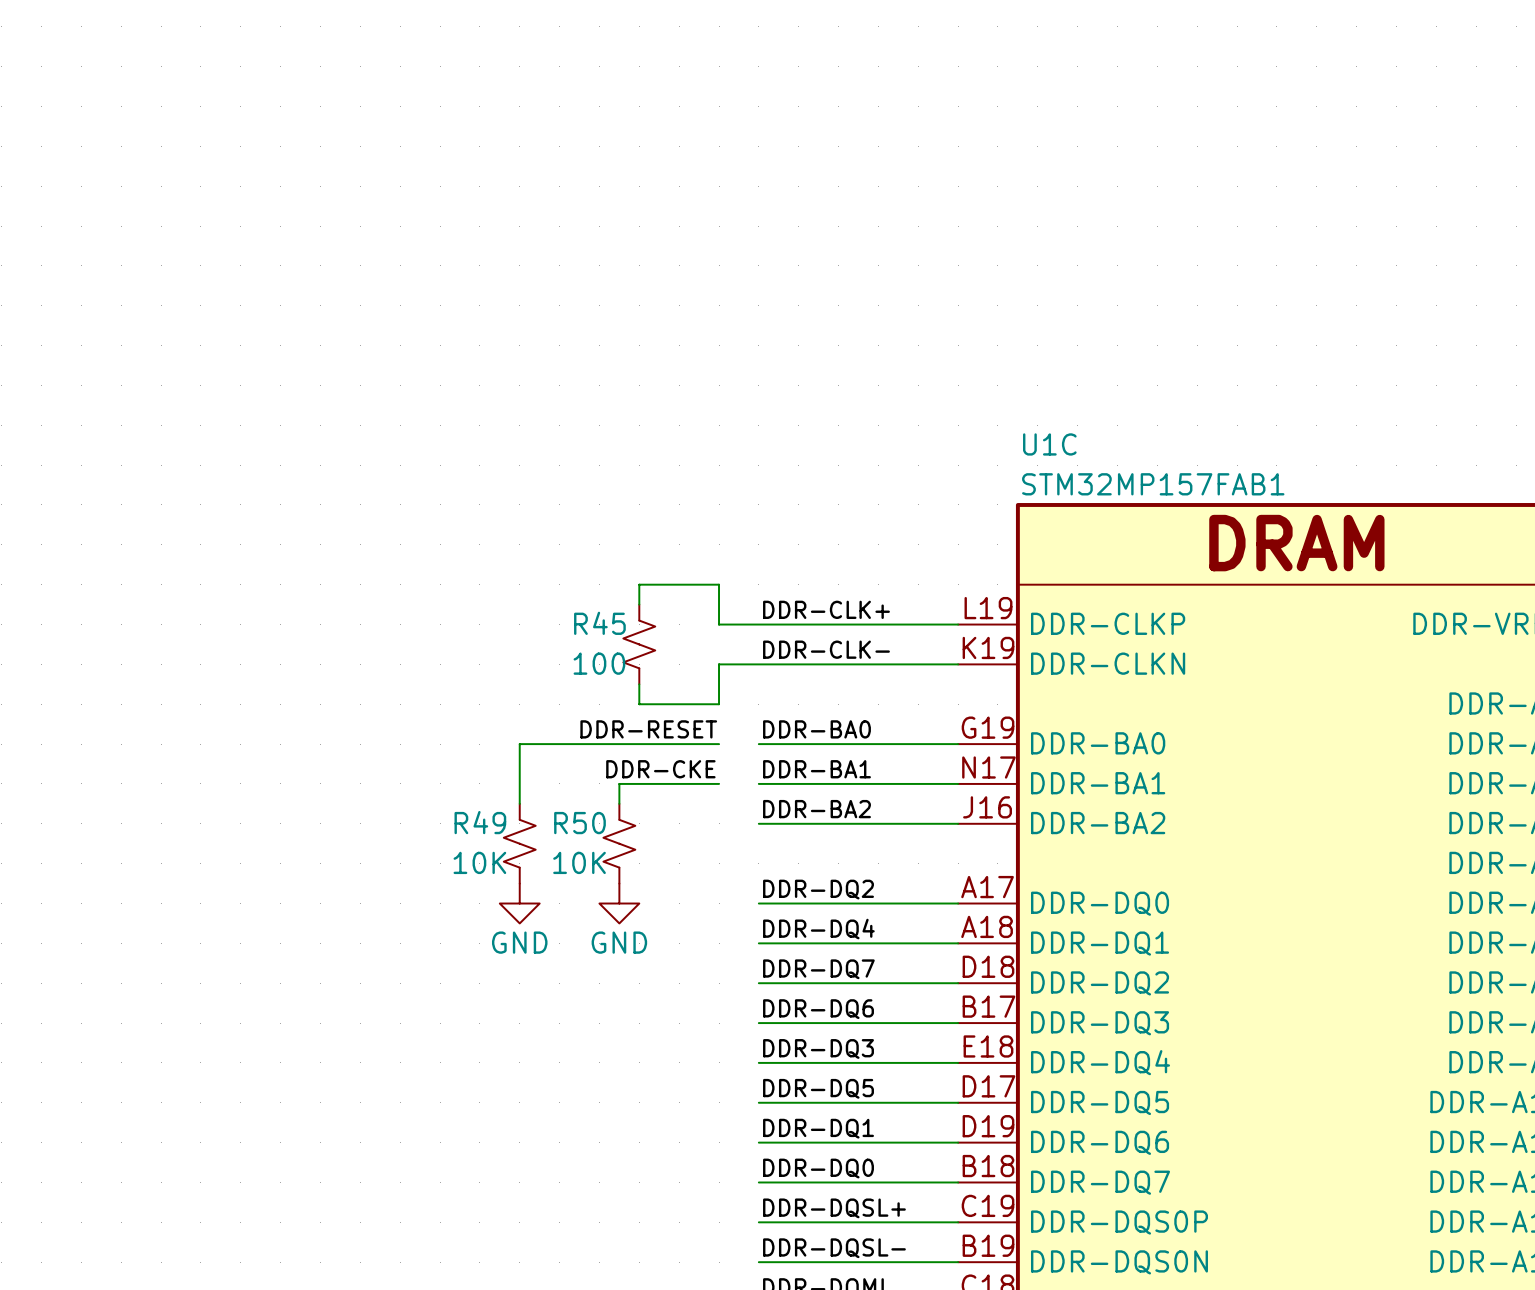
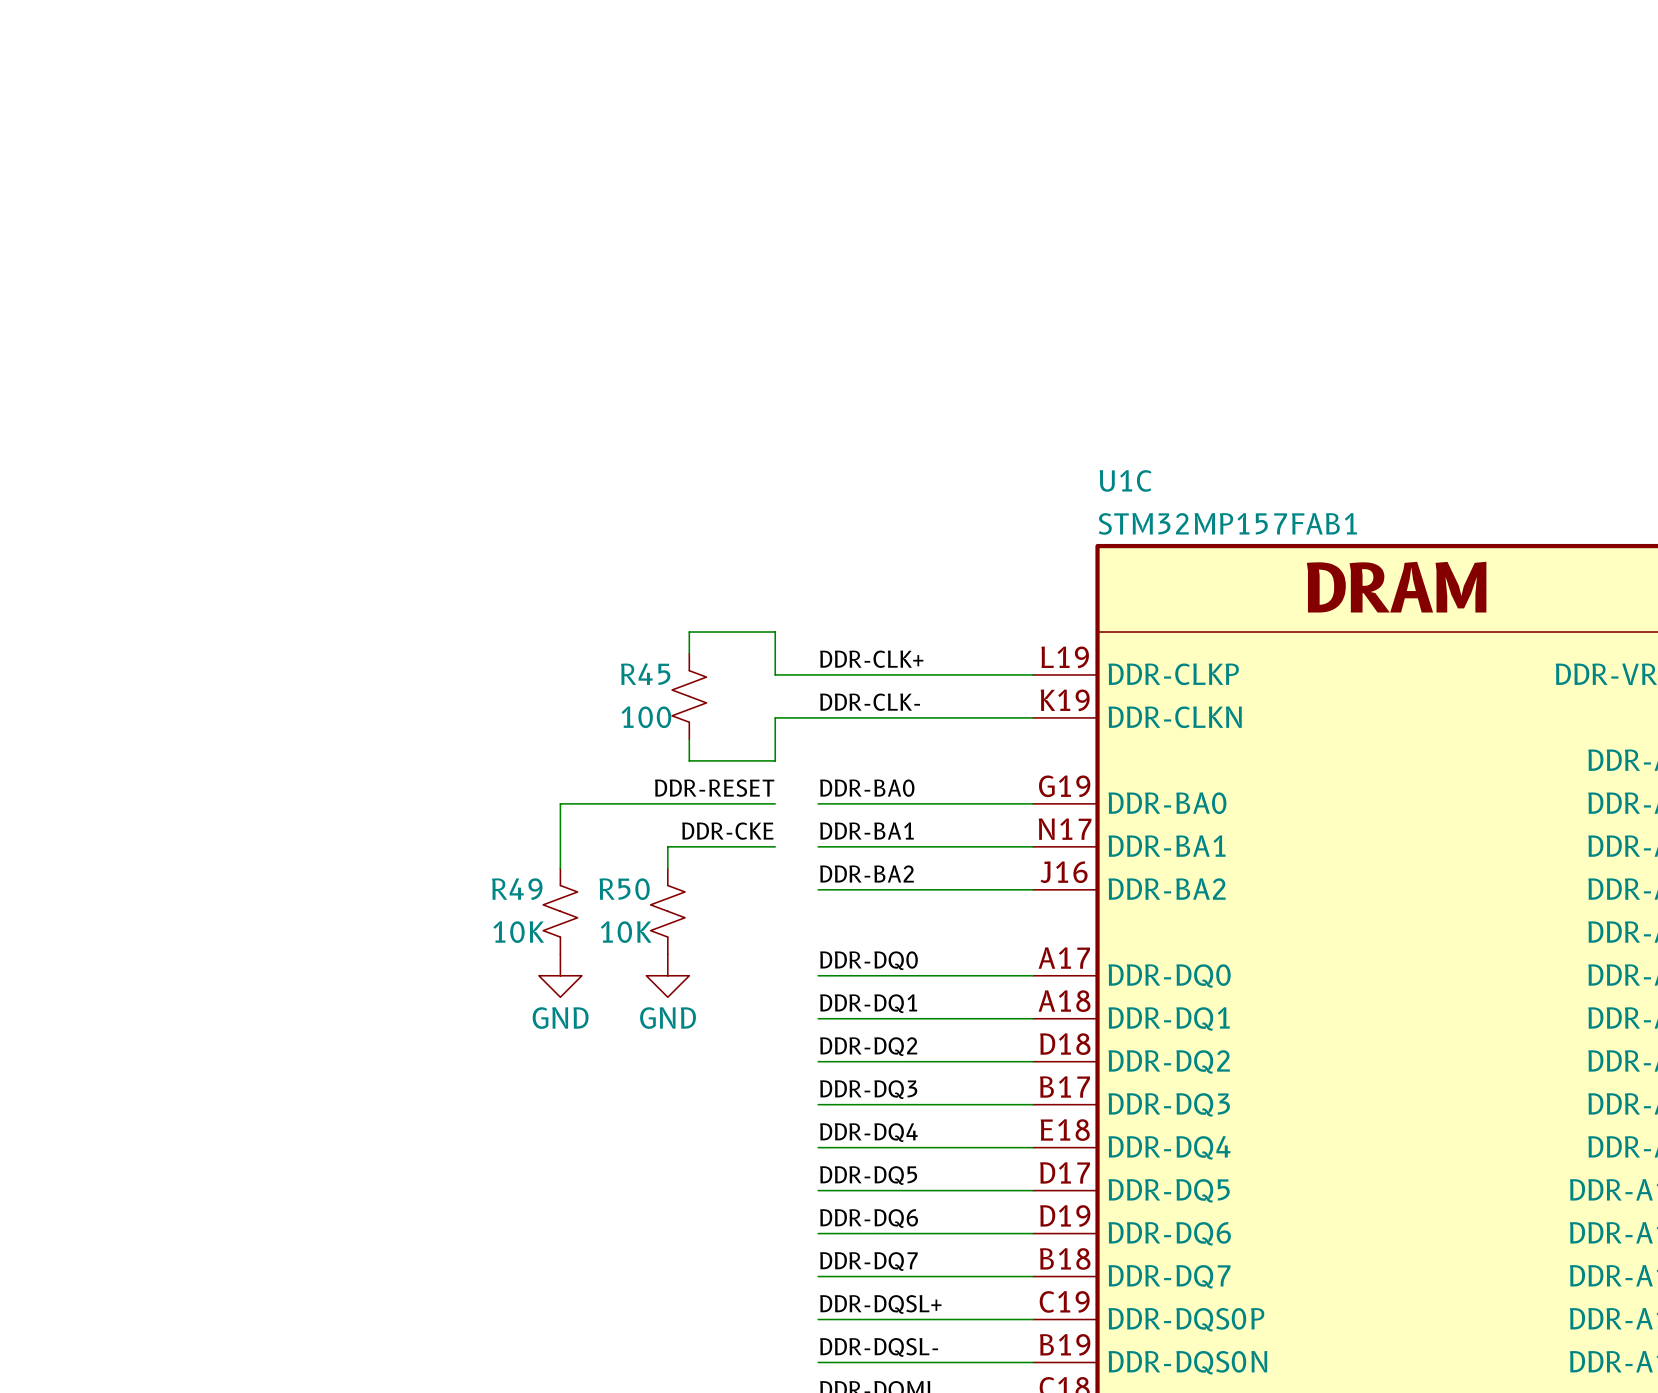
label: DDR-DQ2 (818, 889) -> DDR-DQ0 (868, 960)
label: DDR-DQ4 (818, 929) -> DDR-DQ1 (868, 1003)
label: DDR-DQ7 (818, 969) -> DDR-DQ2 (868, 1046)
label: DDR-DQ6 (818, 1009) -> DDR-DQ3 (868, 1089)
label: DDR-DQ3 (818, 1048) -> DDR-DQ4 (868, 1132)
label: DDR-DQ1 (818, 1128) -> DDR-DQ6 (869, 1218)
label: DDR-DQ0 (818, 1168) -> DDR-DQ7 (868, 1261)

